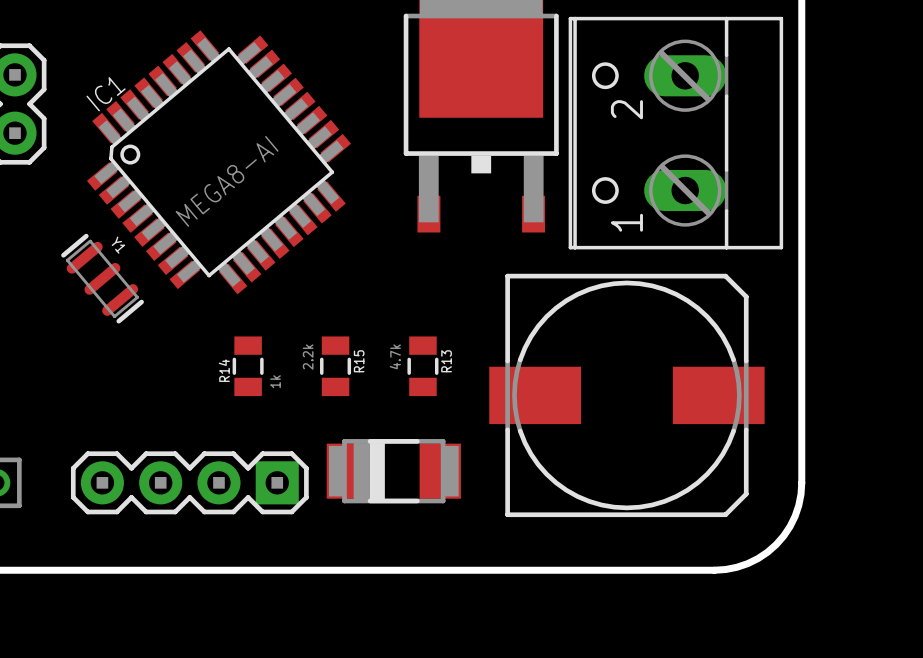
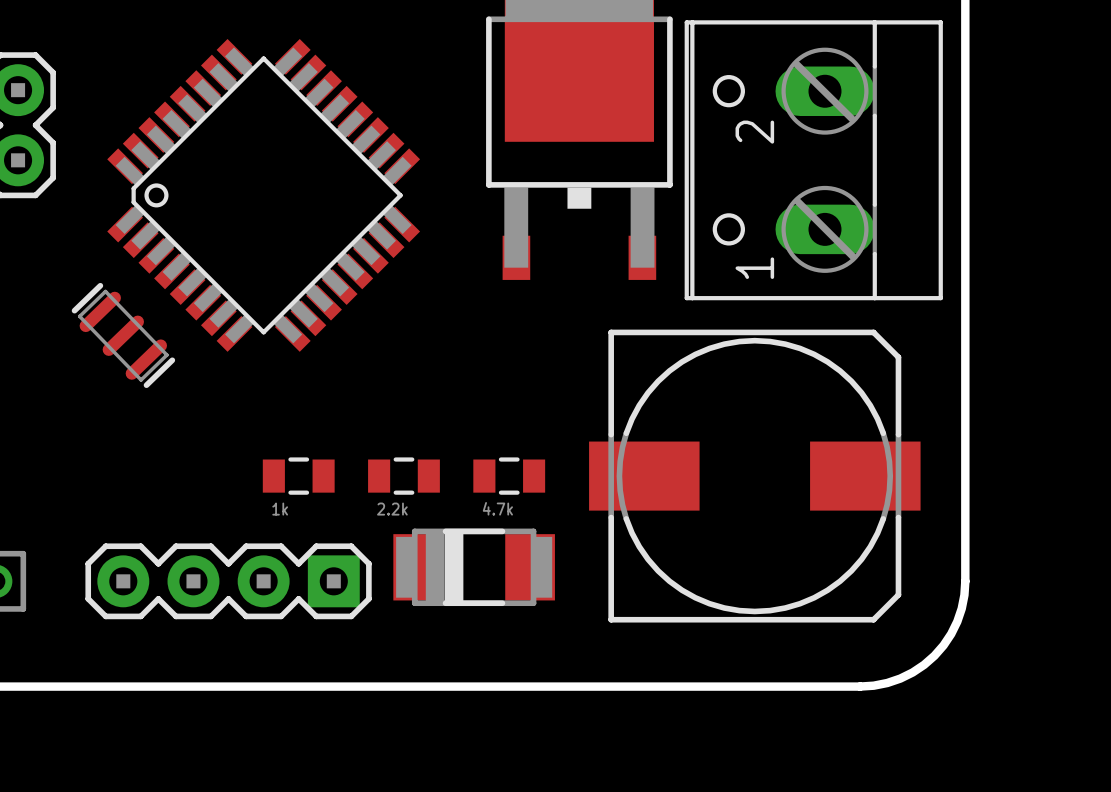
IC1: MEGA8-AI (218, 162) -> none
part: none -> (263, 195)
Y1: (102, 278) -> none
part: none -> (123, 335)
R14: 1k (248, 366) -> none
R15: 2.2k (335, 366) -> none
R13: 4.7k (422, 366) -> none
part: none -> 1k (298, 476)
part: none -> 2.2k (403, 476)
part: none -> 4.7k (509, 476)

